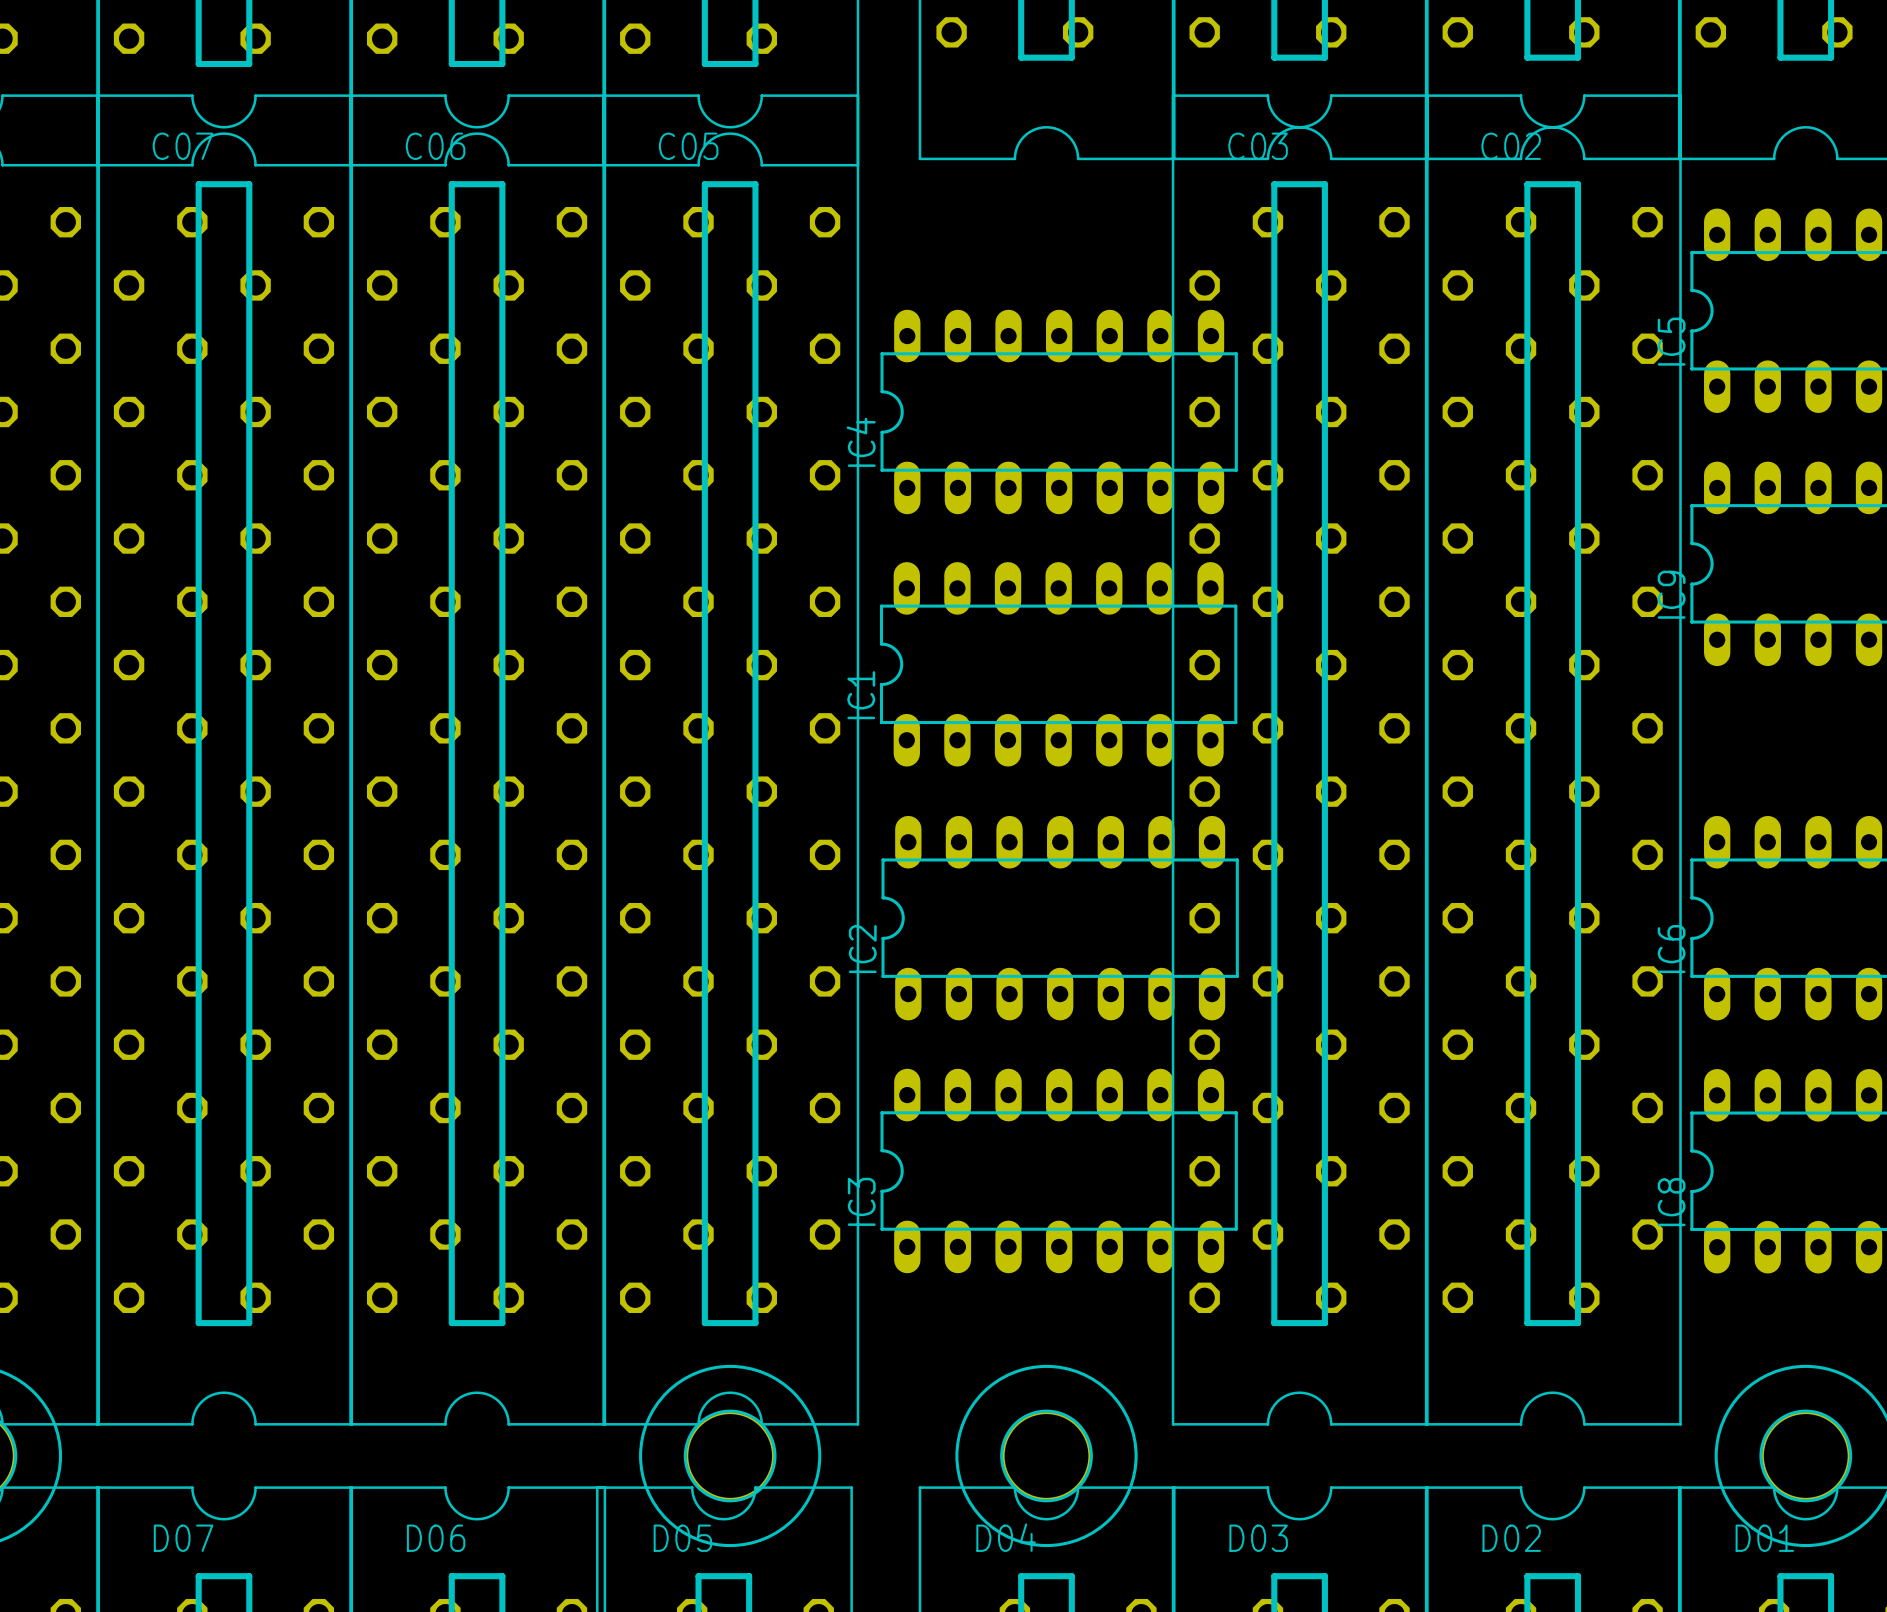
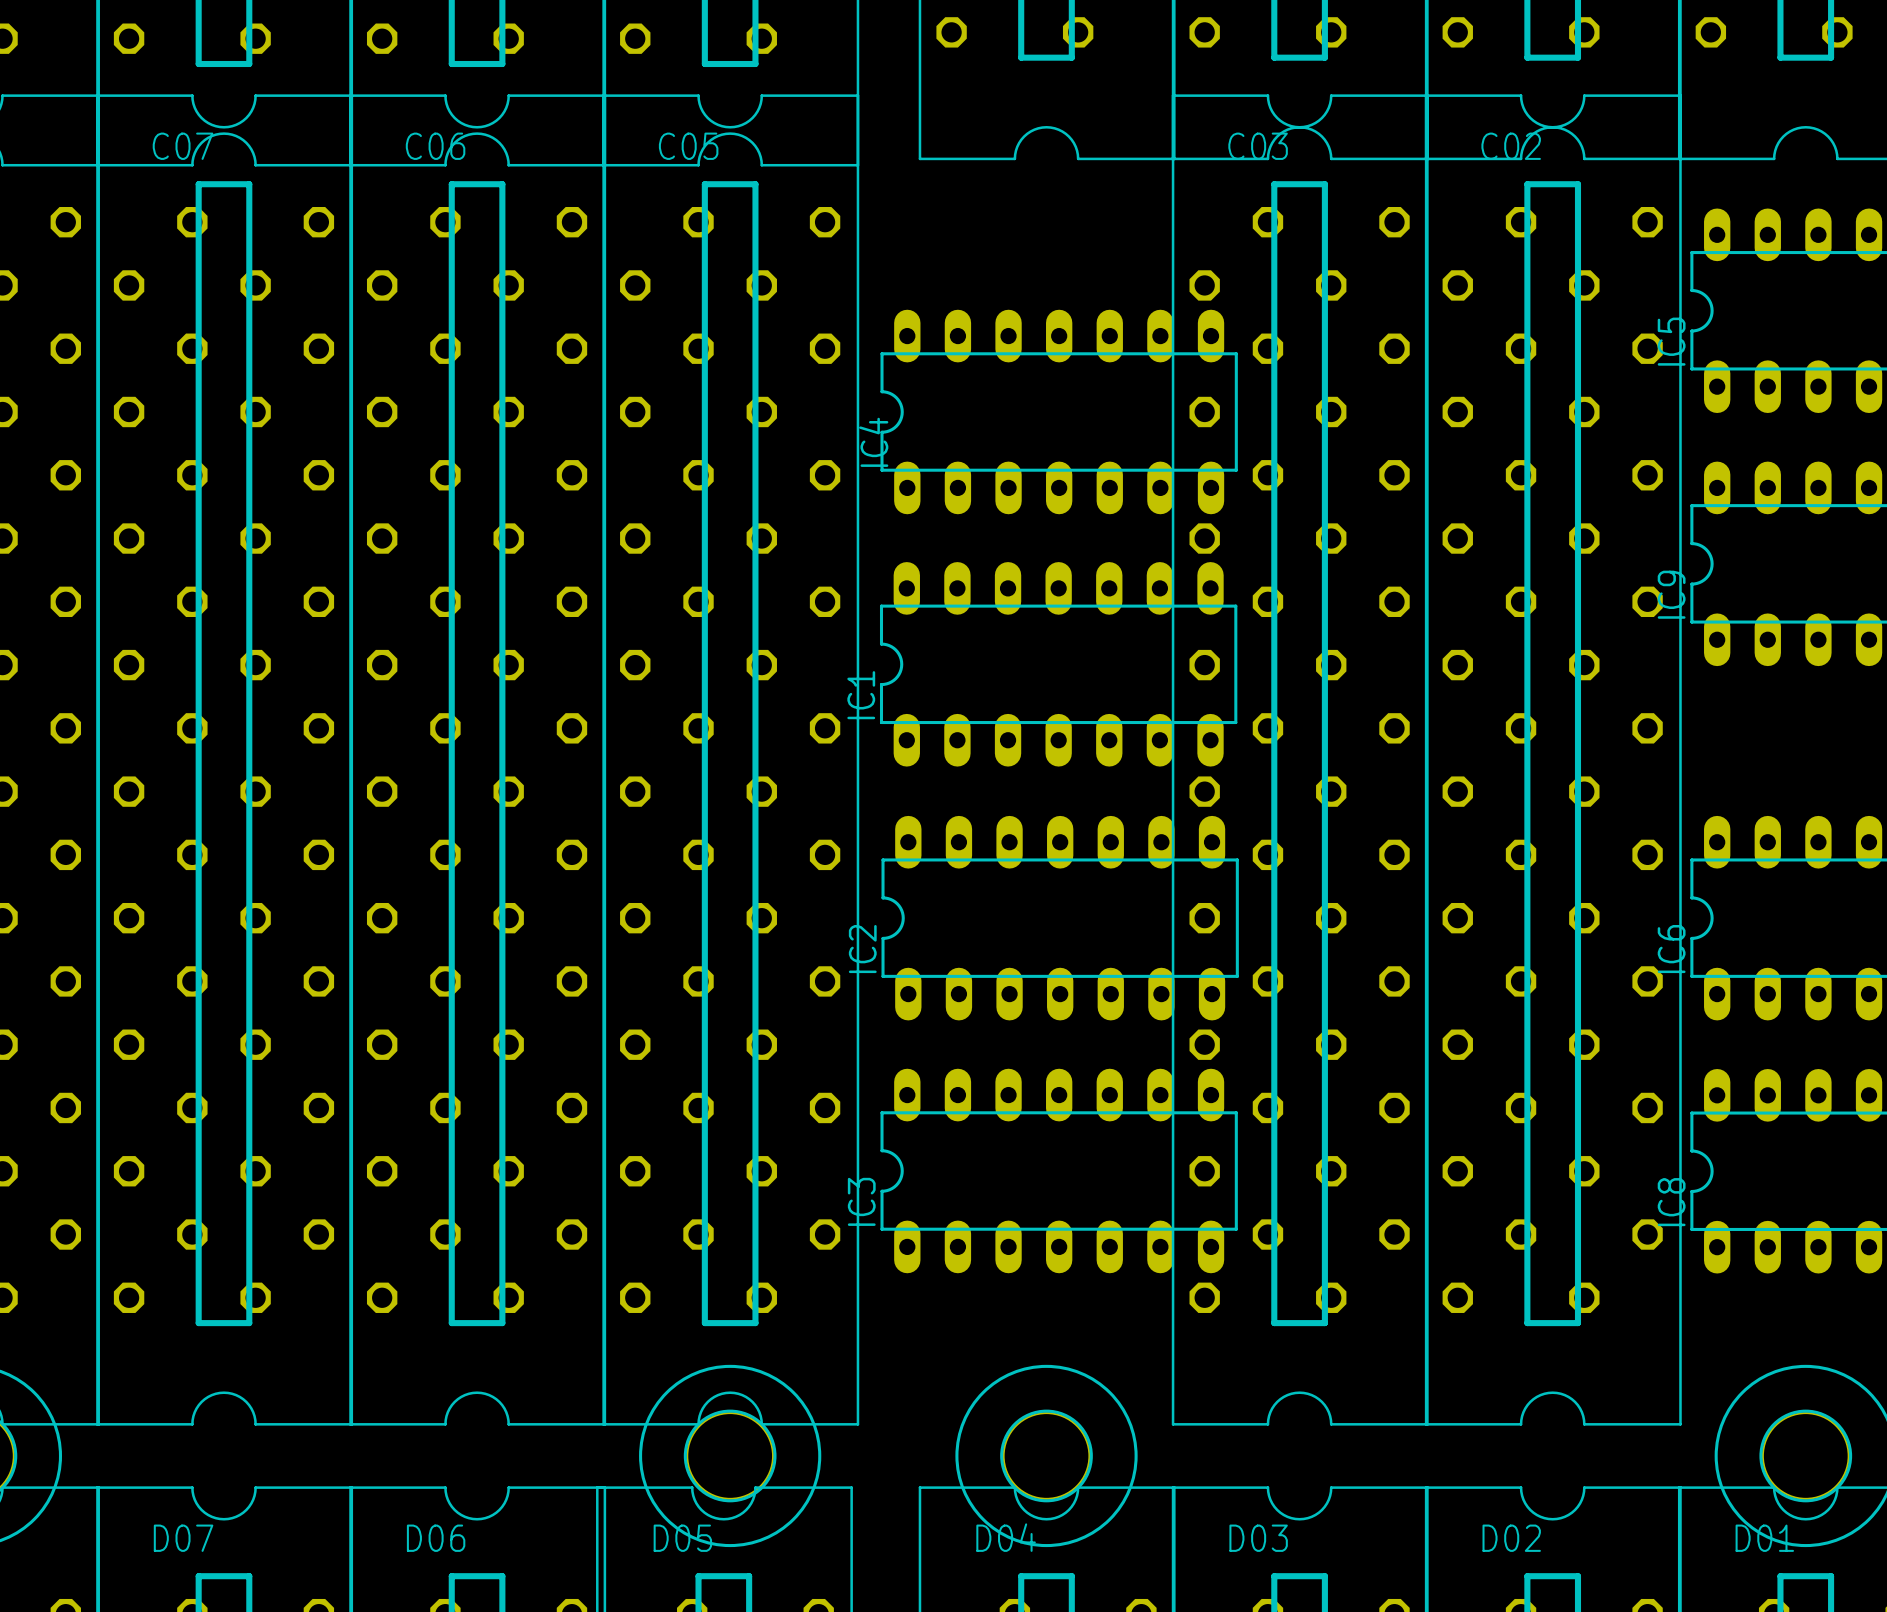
IC4 name position: IC4 (861, 442) -> IC4 (873, 442)

